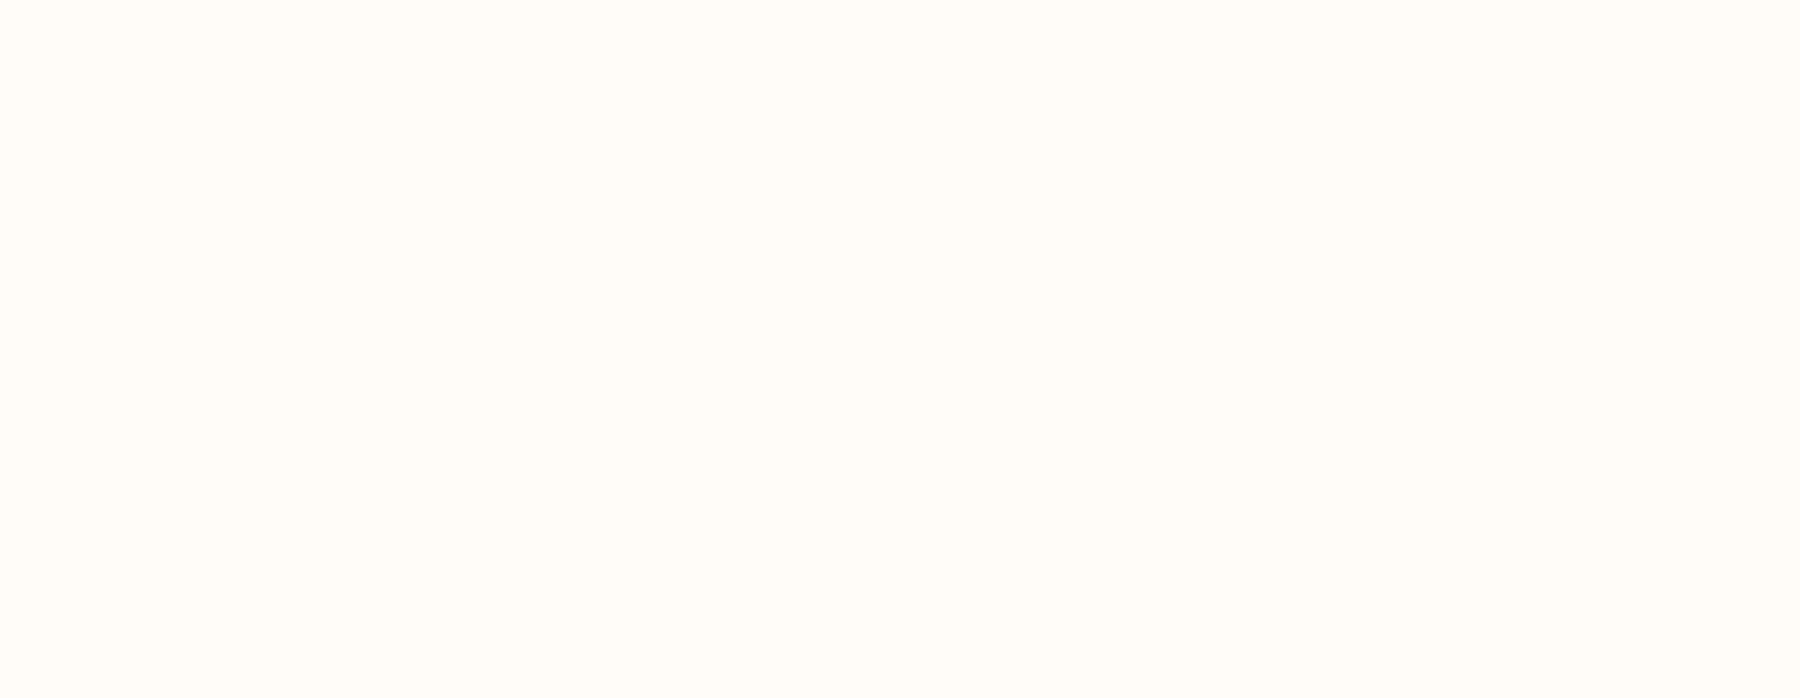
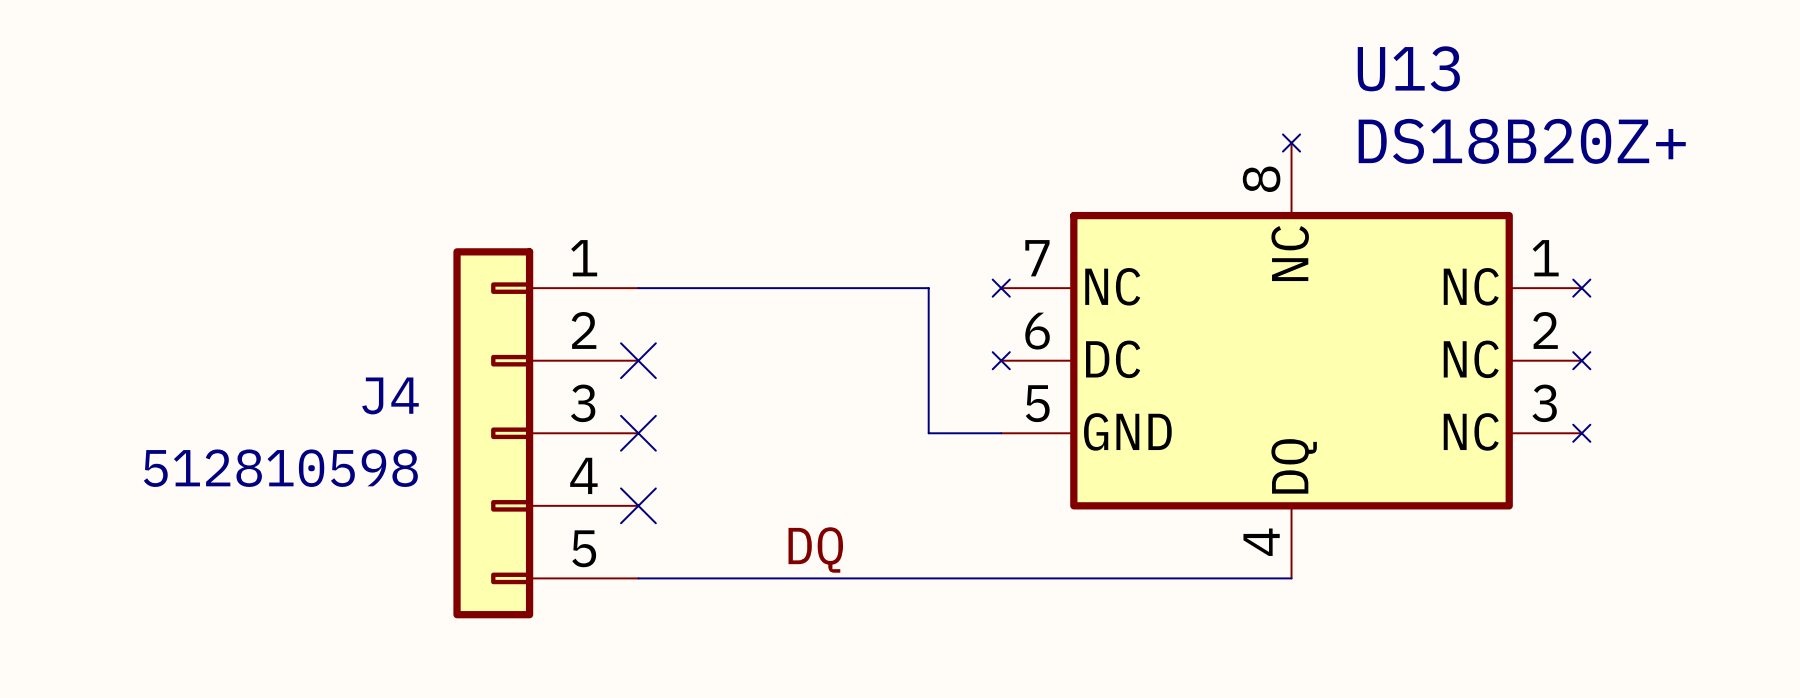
wire: none -> (638, 288) (928, 288) (928, 433) (1001, 433)
U13: none -> DS18B20Z+ (1291, 356)
no-connect mark: none -> (638, 360)
J4: none -> 512810598 (545, 433)
no-connect mark: none -> (638, 433)
no-connect mark: none -> (638, 505)
label: none -> DQ (815, 549)
wire: none -> (638, 578) (1291, 578)

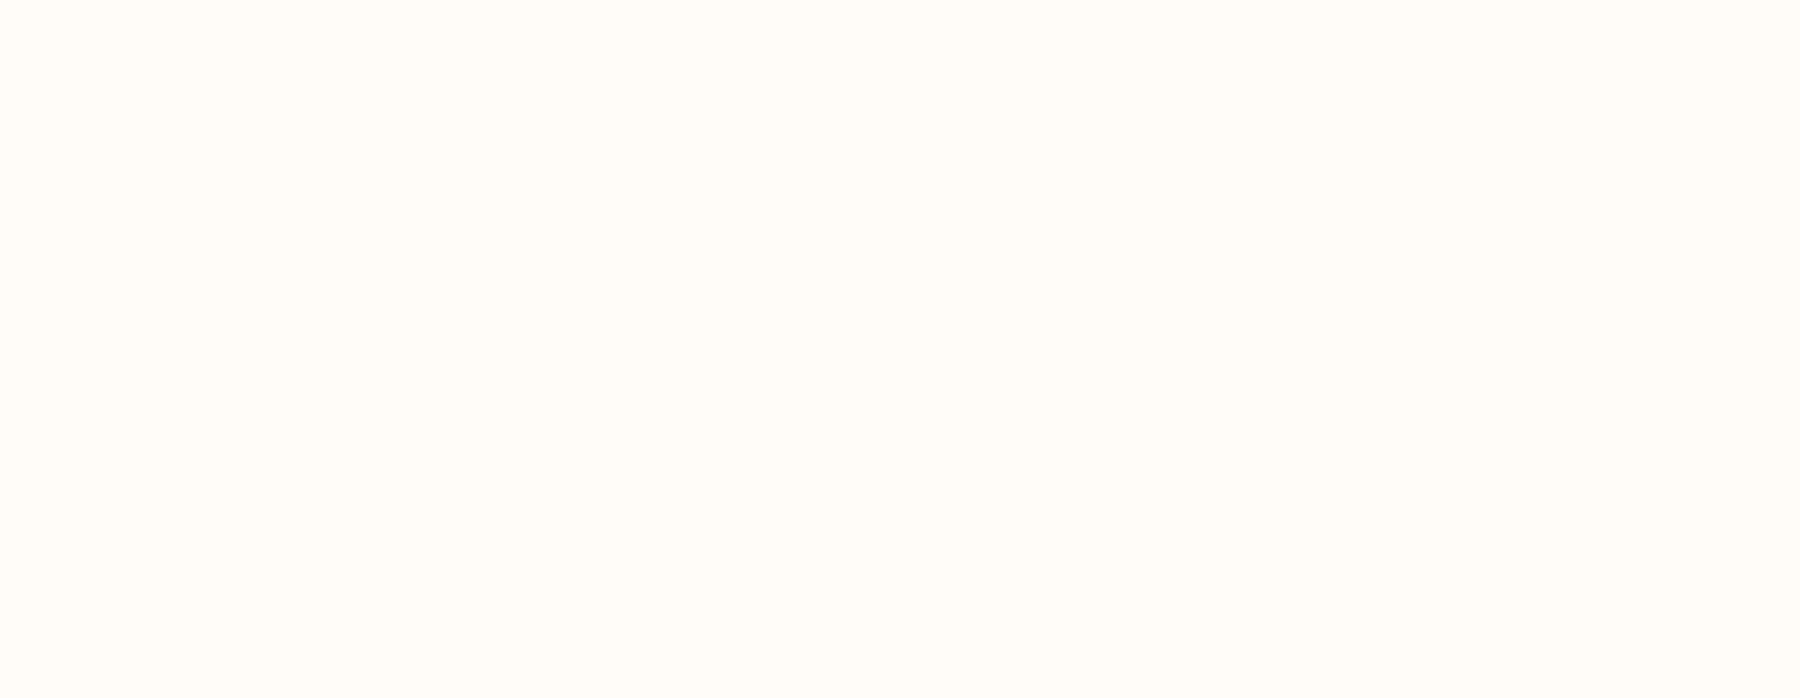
wire: (638, 288) (928, 288) (928, 433) (1001, 433) -> none
U13: DS18B20Z+ (1291, 356) -> none
no-connect mark: (638, 360) -> none
J4: 512810598 (545, 433) -> none
no-connect mark: (638, 433) -> none
no-connect mark: (638, 505) -> none
label: DQ (815, 549) -> none
wire: (638, 578) (1291, 578) -> none

